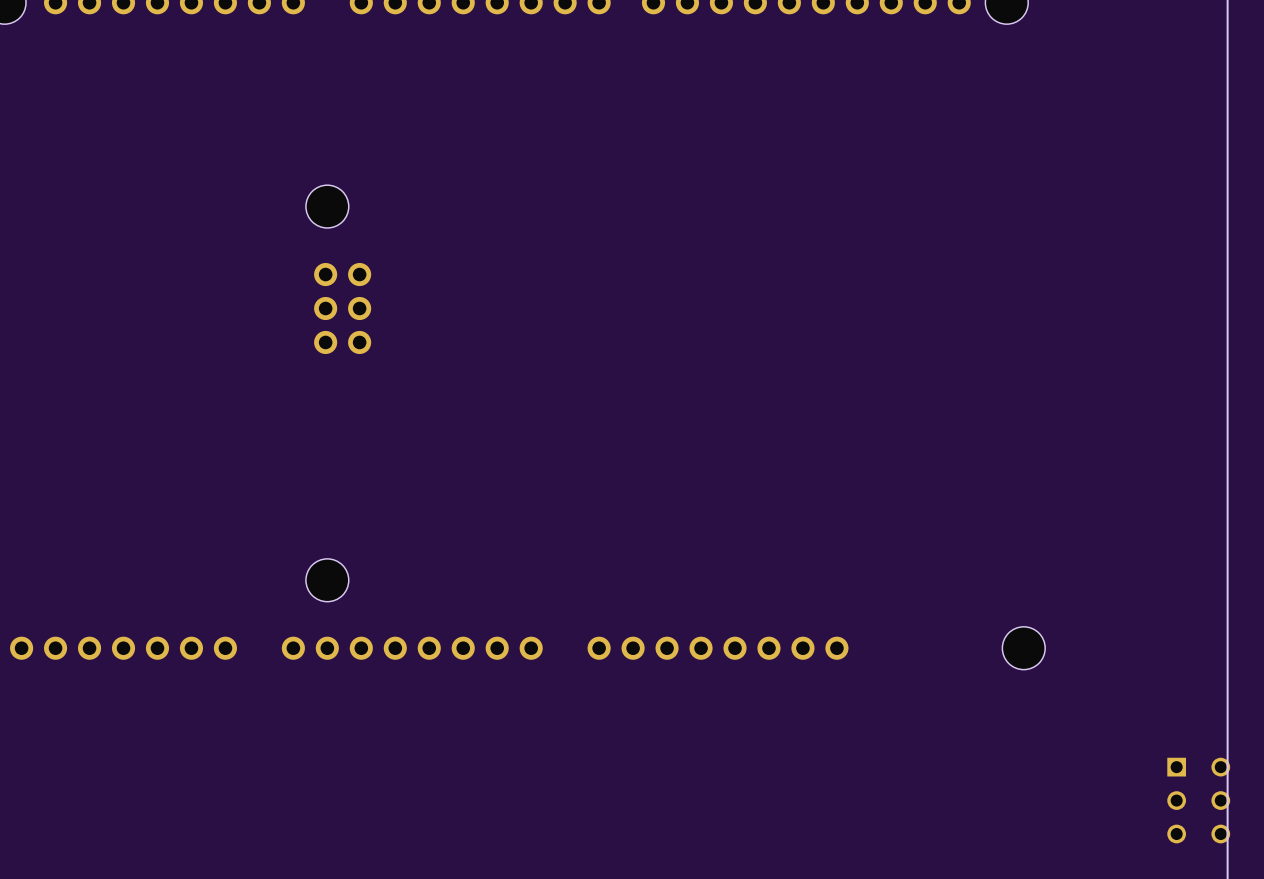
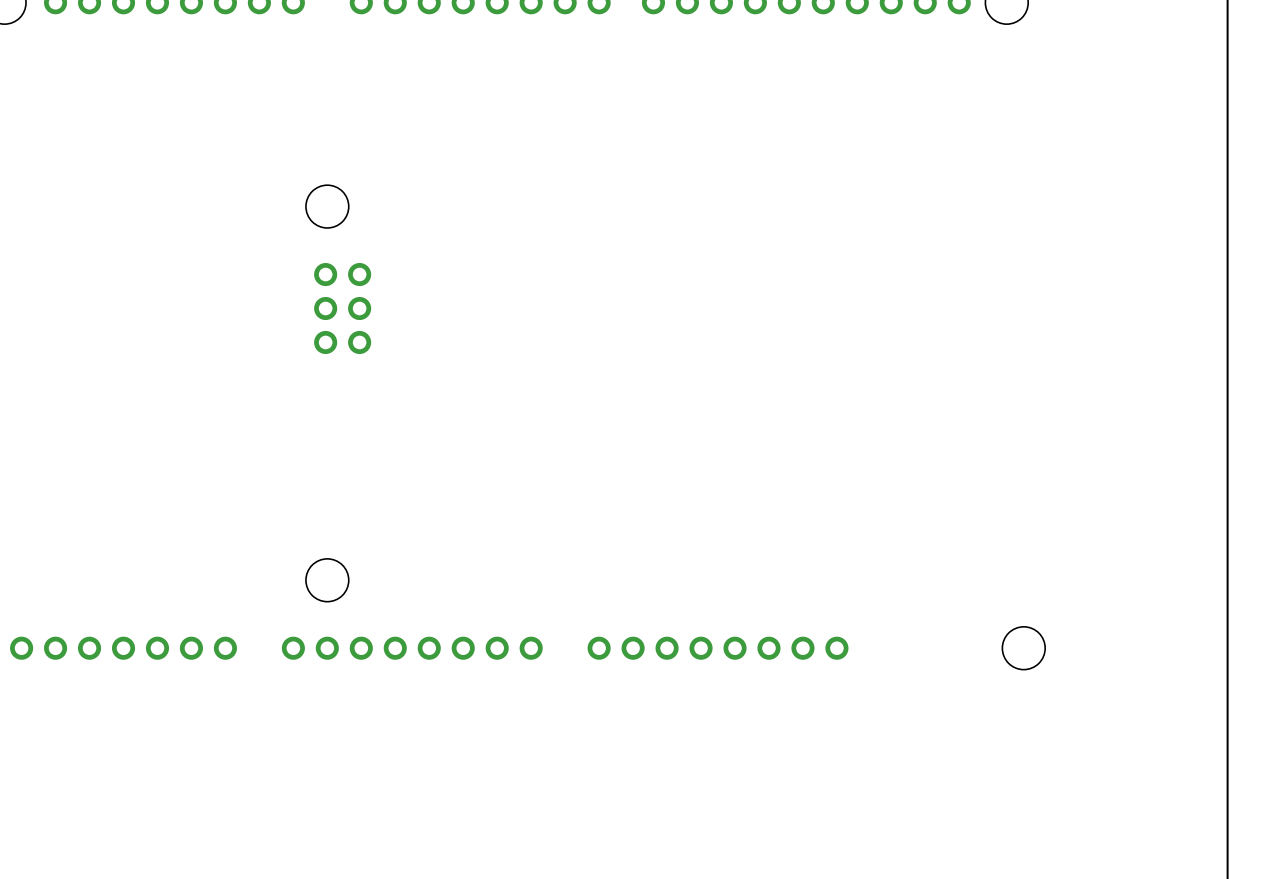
part: (1198, 800) -> none

